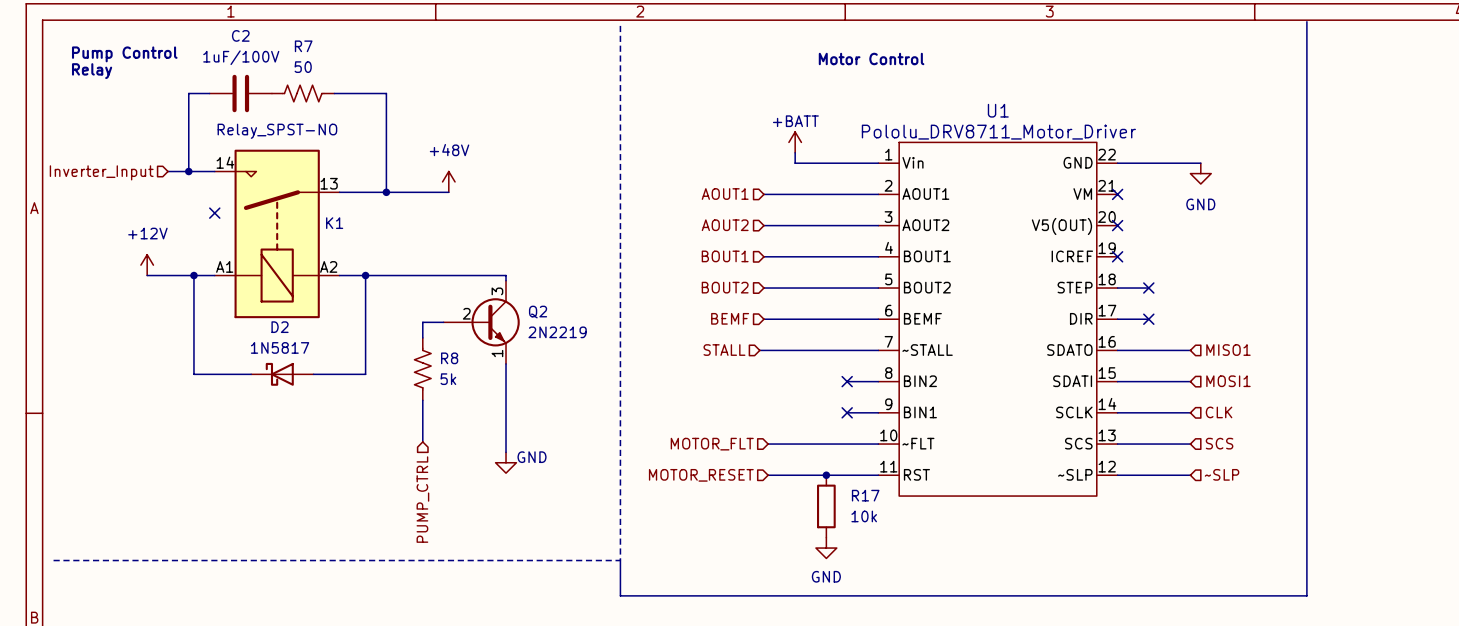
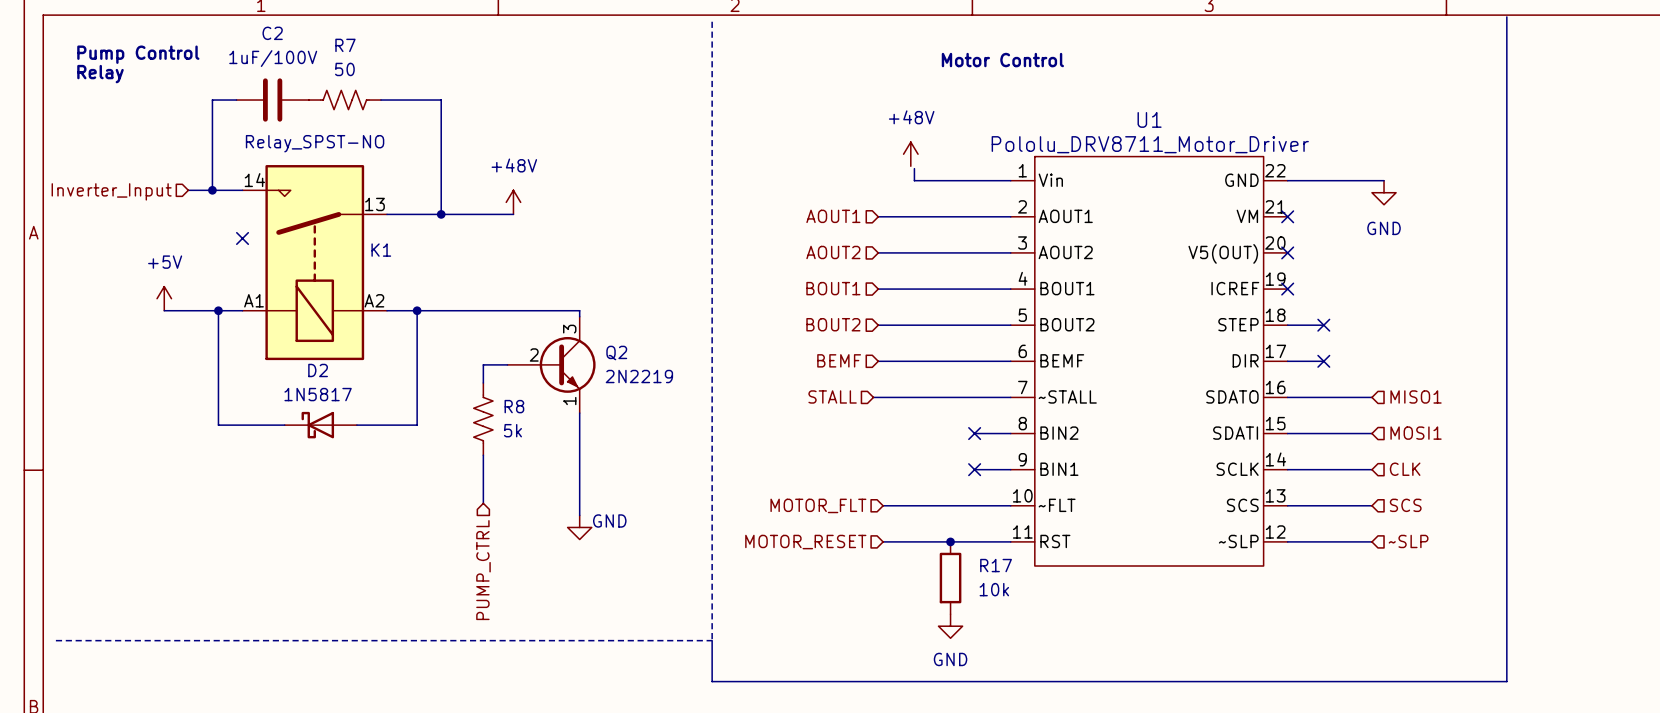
power symbol: +BATT (795, 142) -> +48V (910, 154)
power symbol: +12V (147, 265) -> +5V (164, 298)

